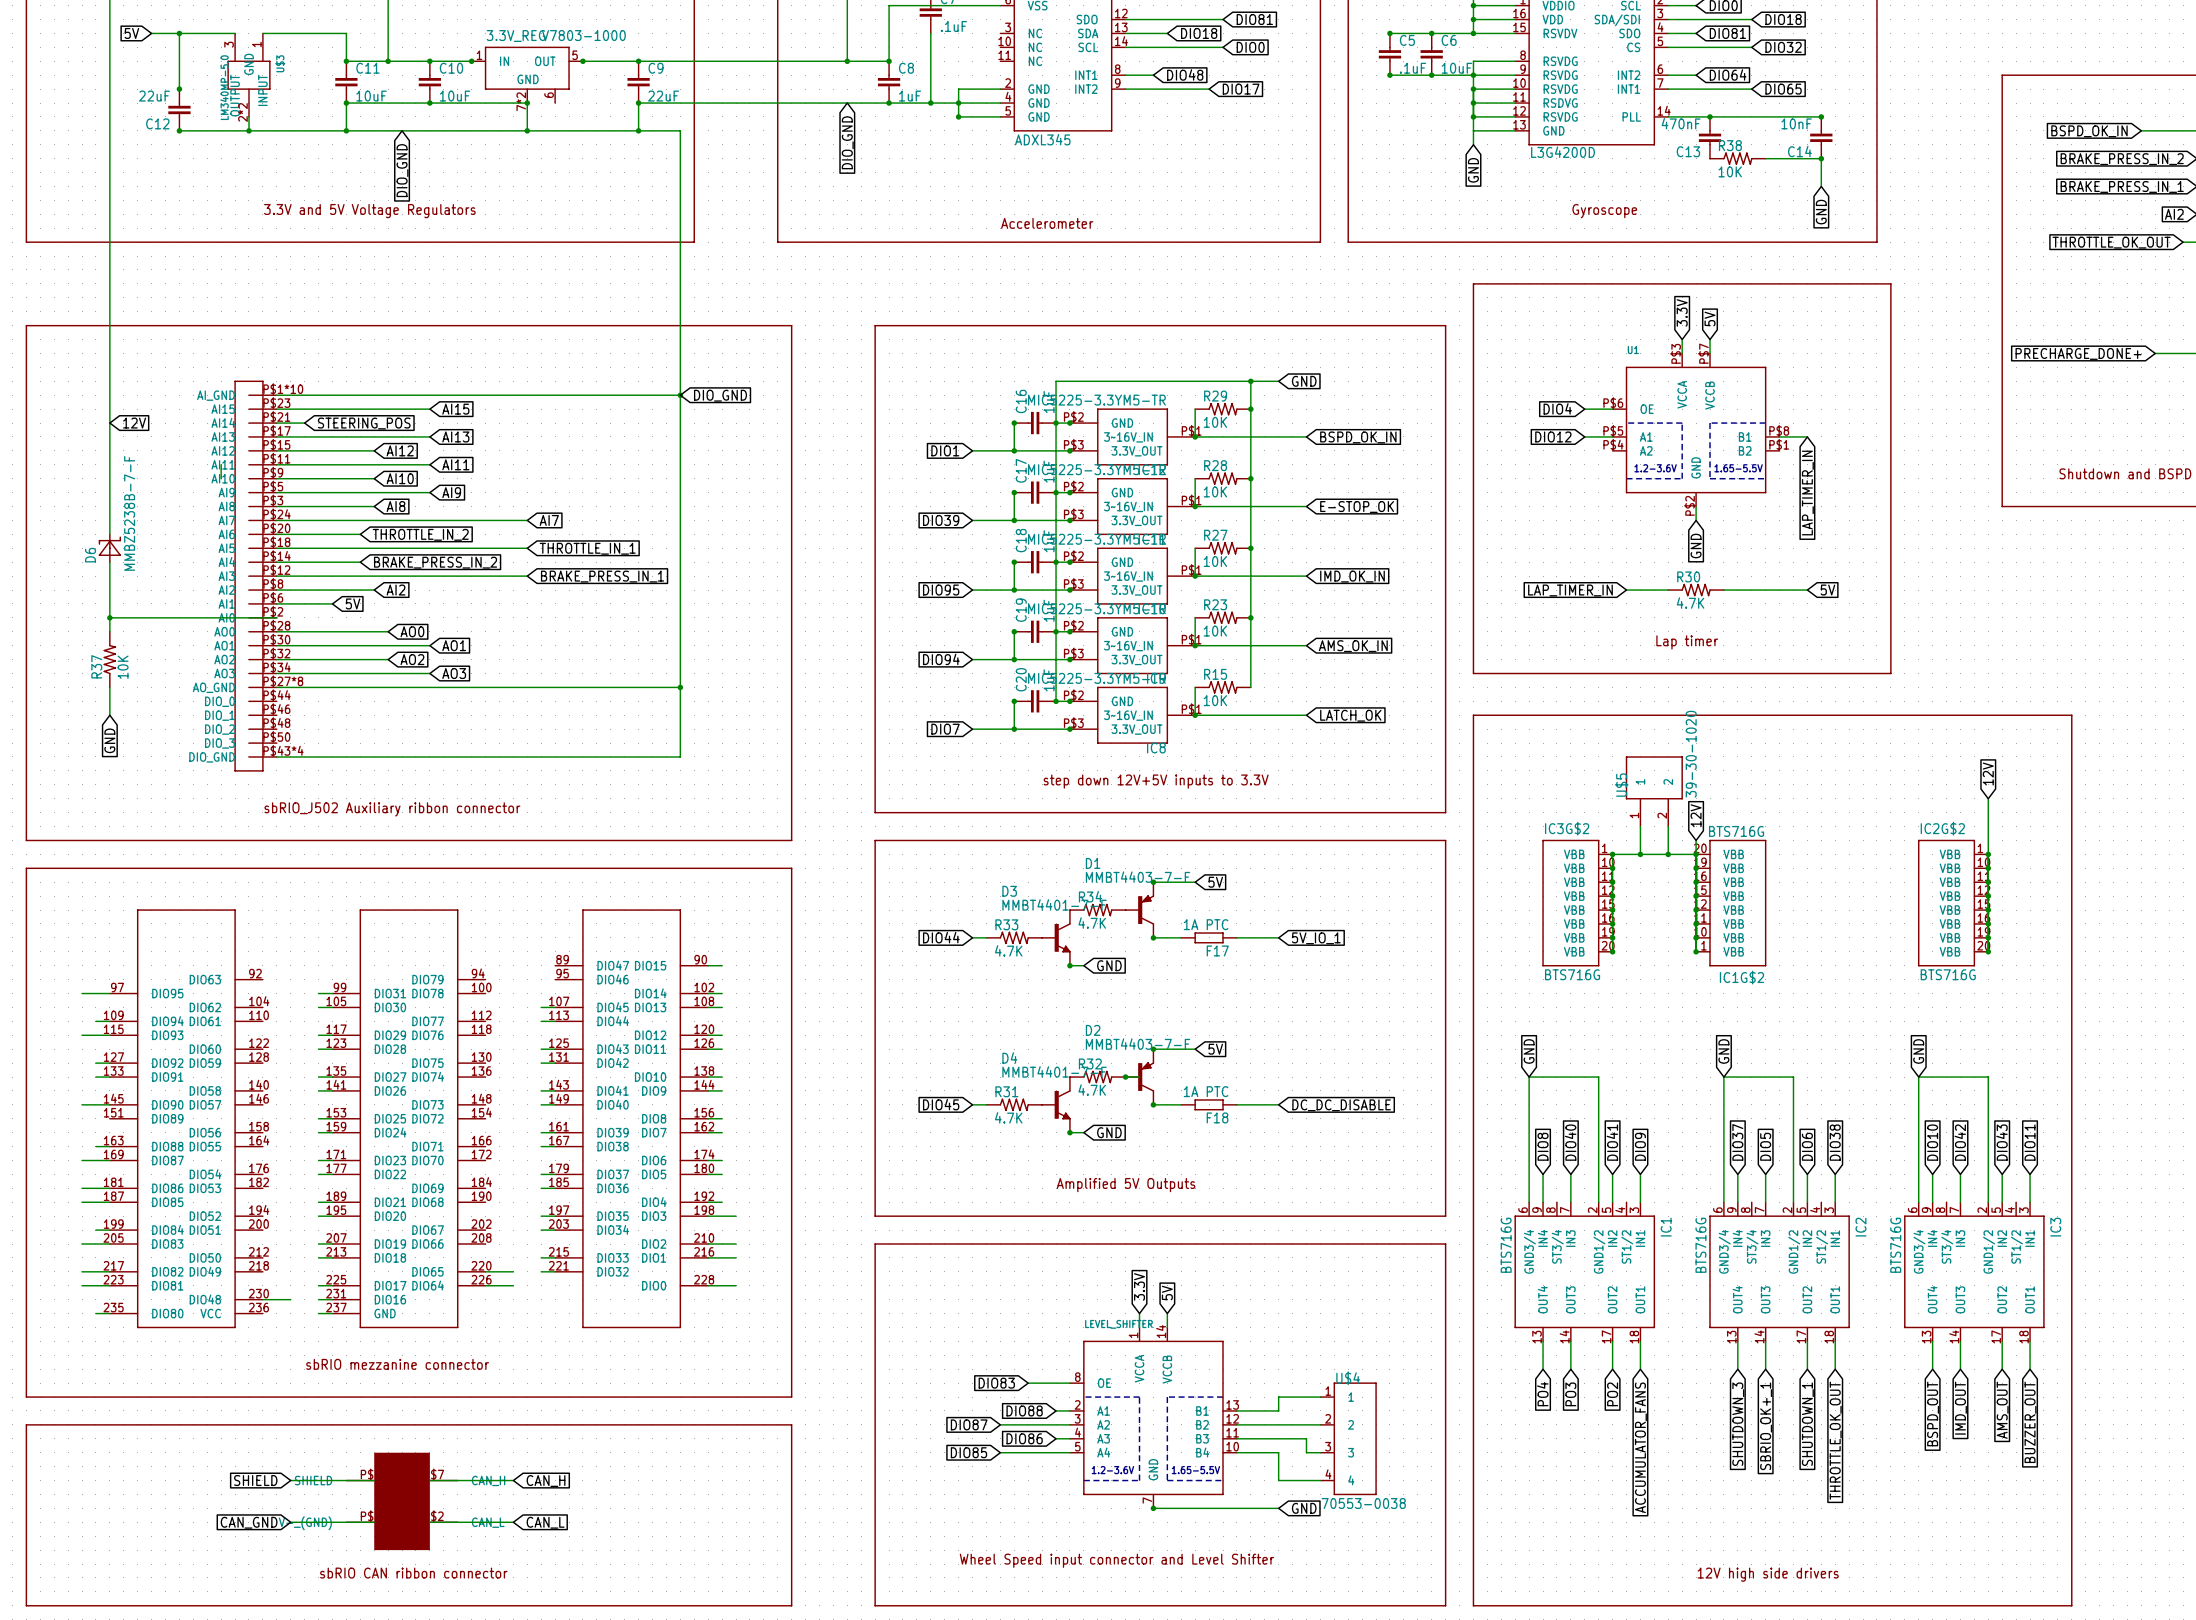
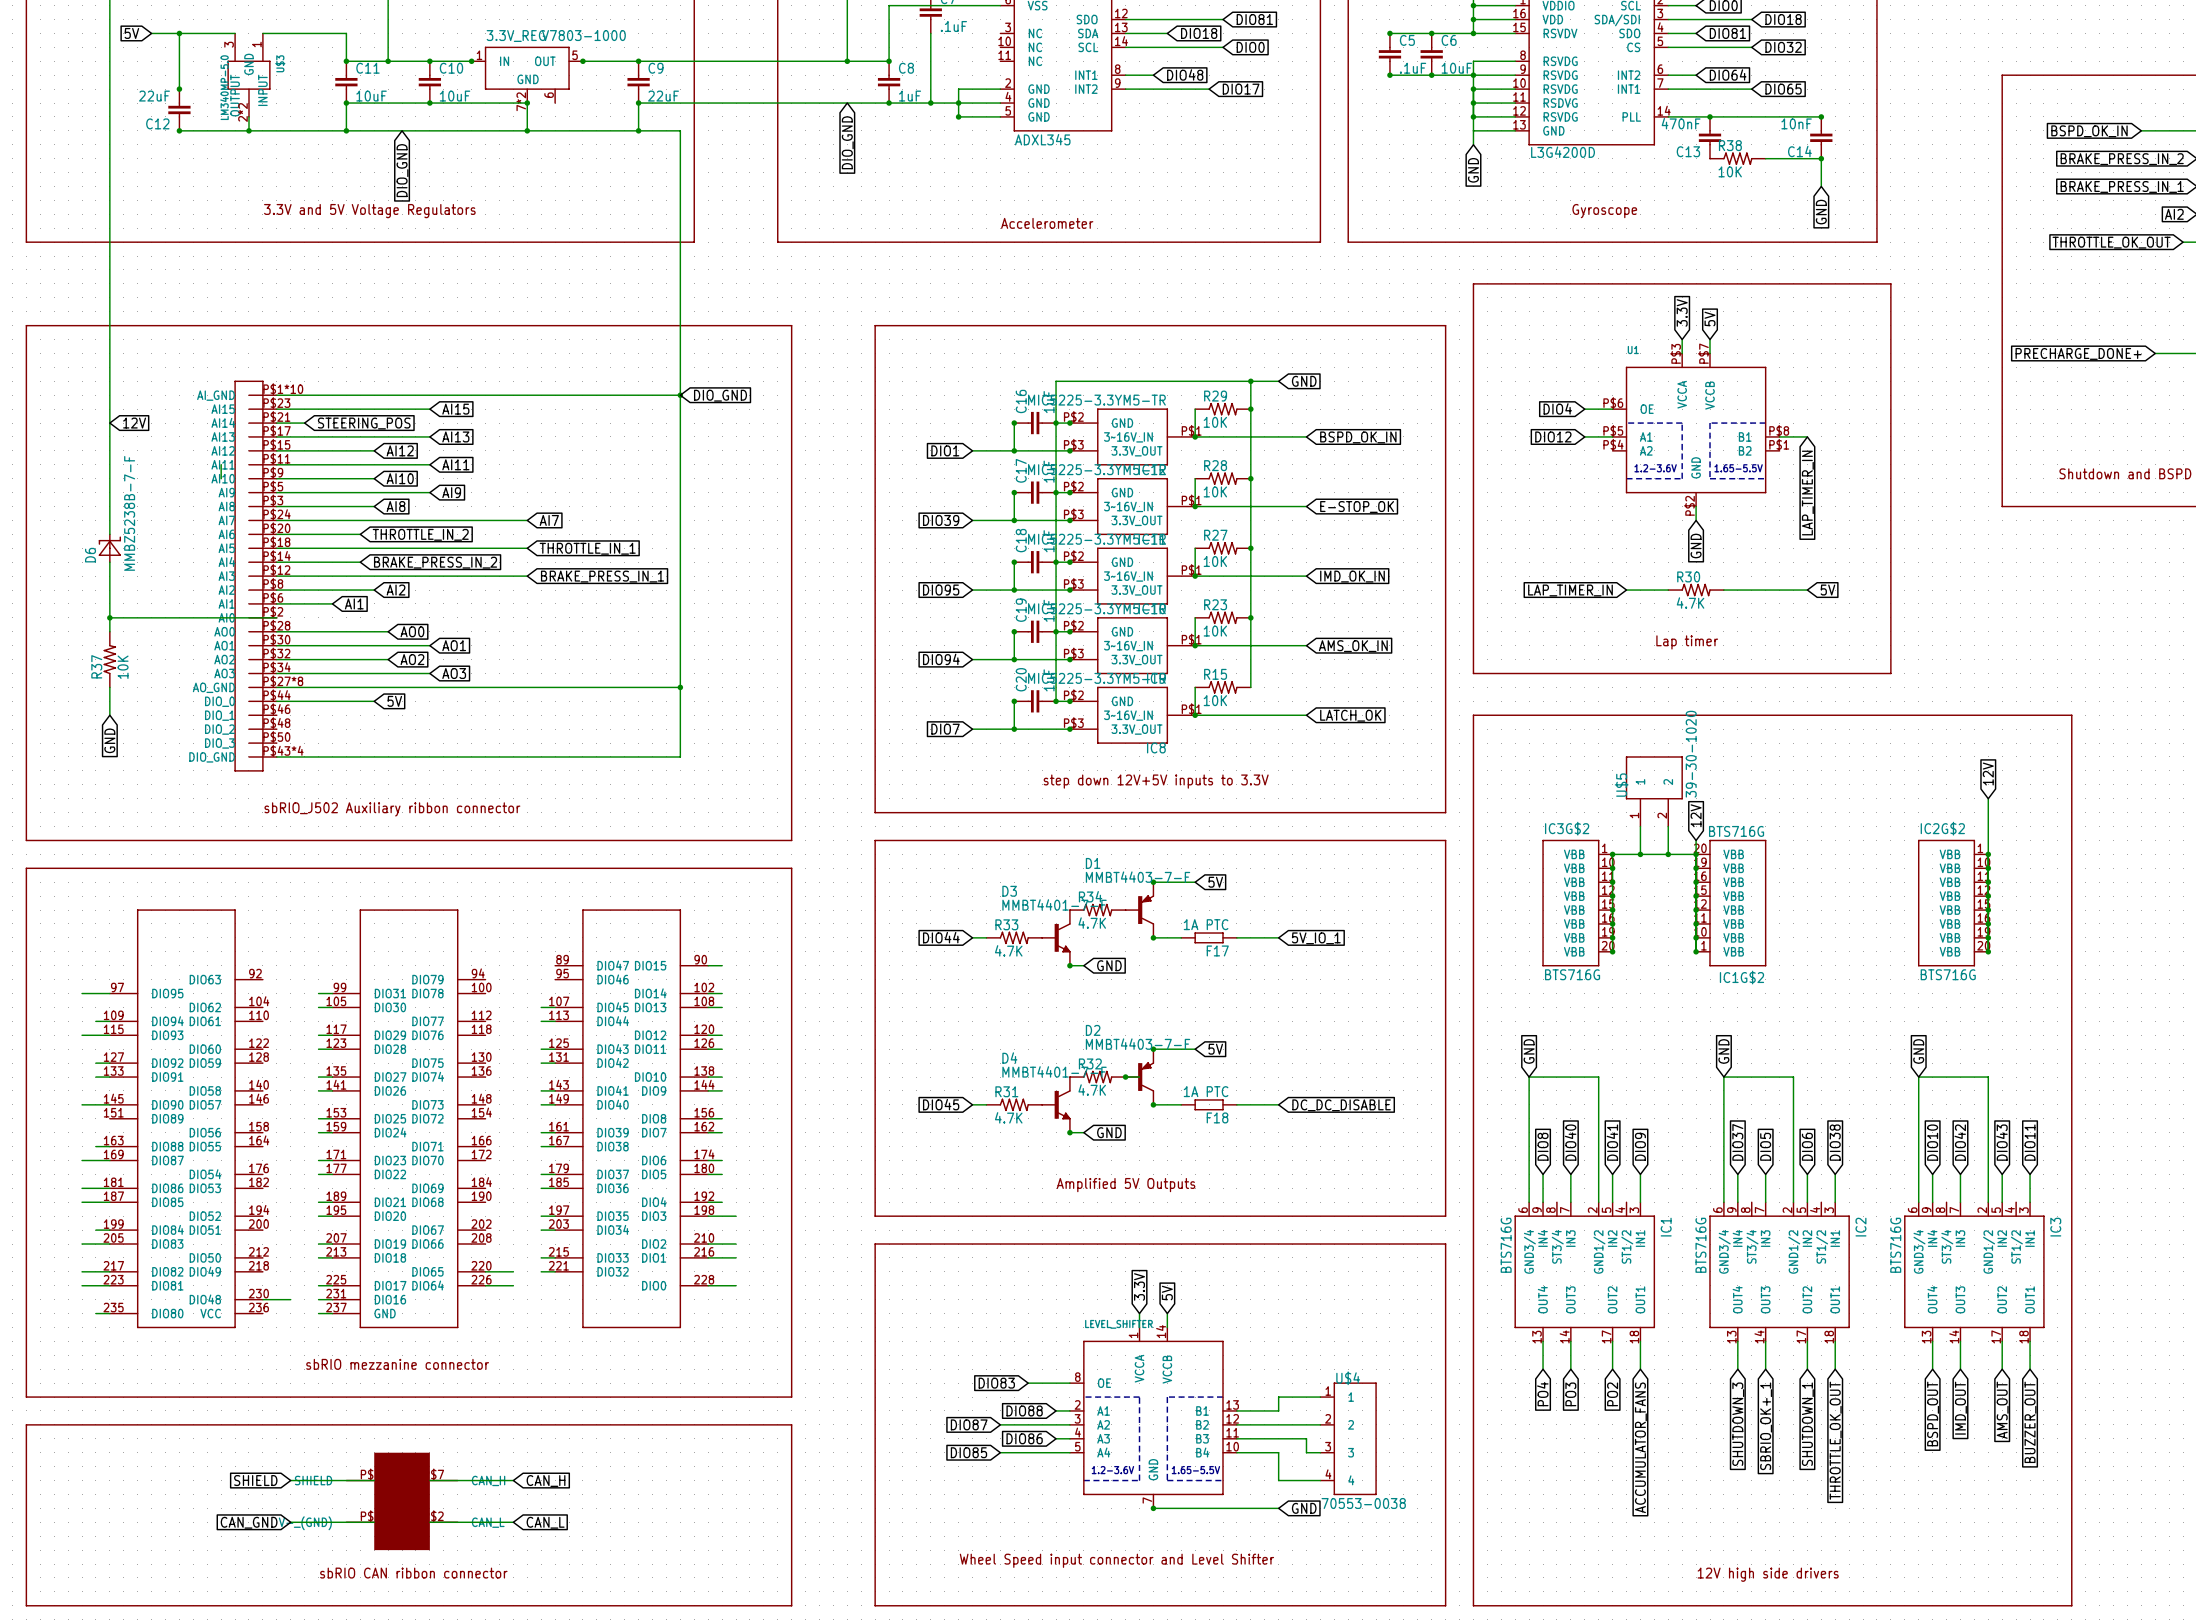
global label: 5V (353, 603) -> AI1 (354, 603)
wire: none -> (276, 701) (374, 701)
global label: none -> 5V (394, 701)

